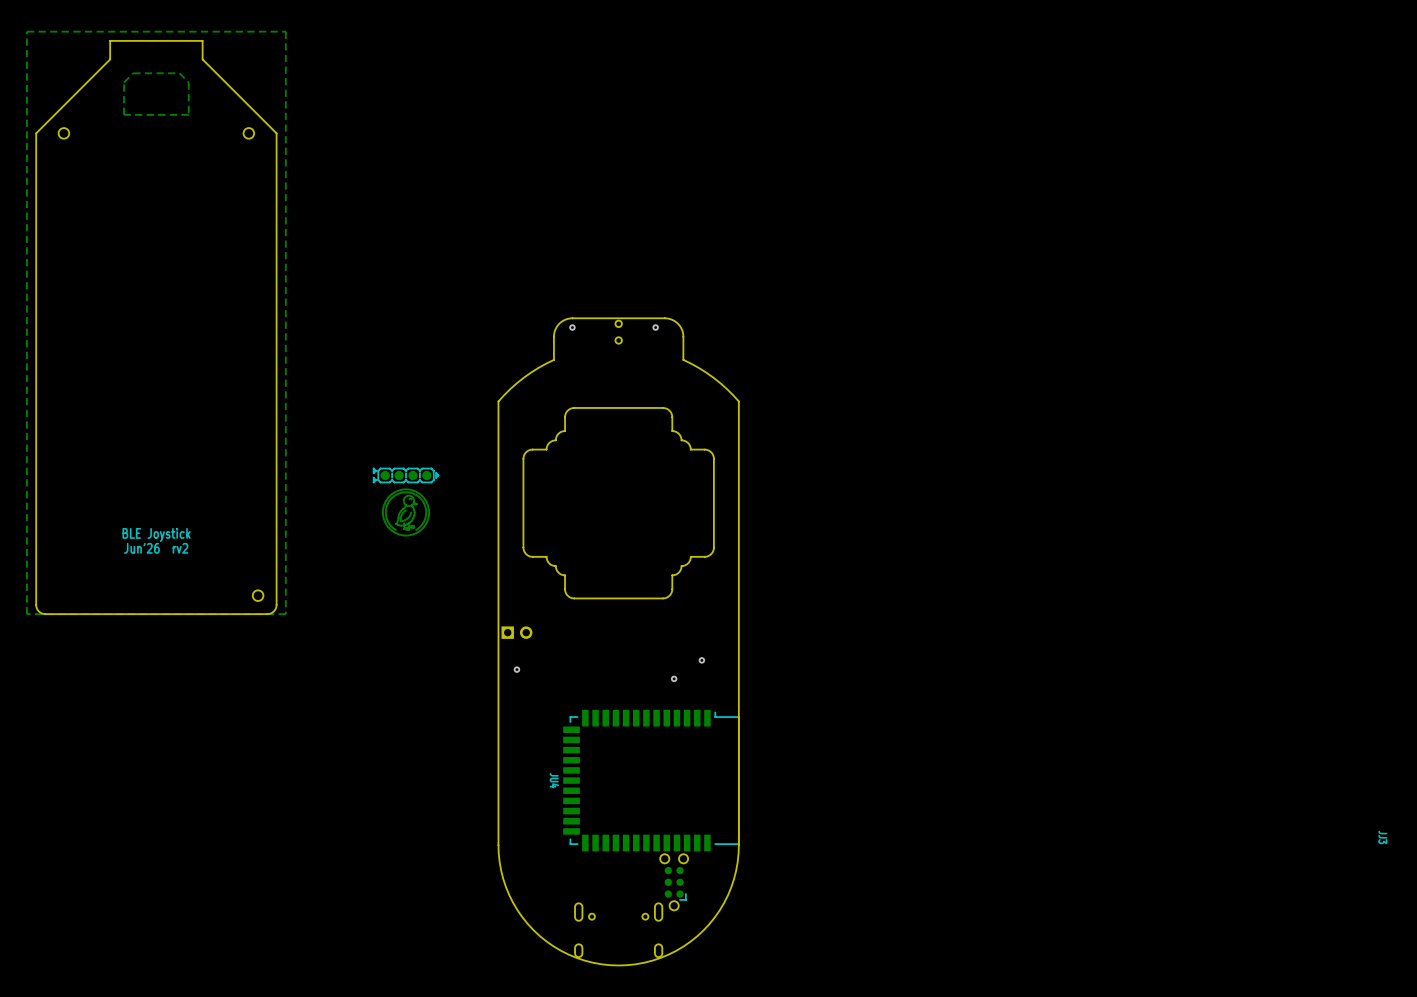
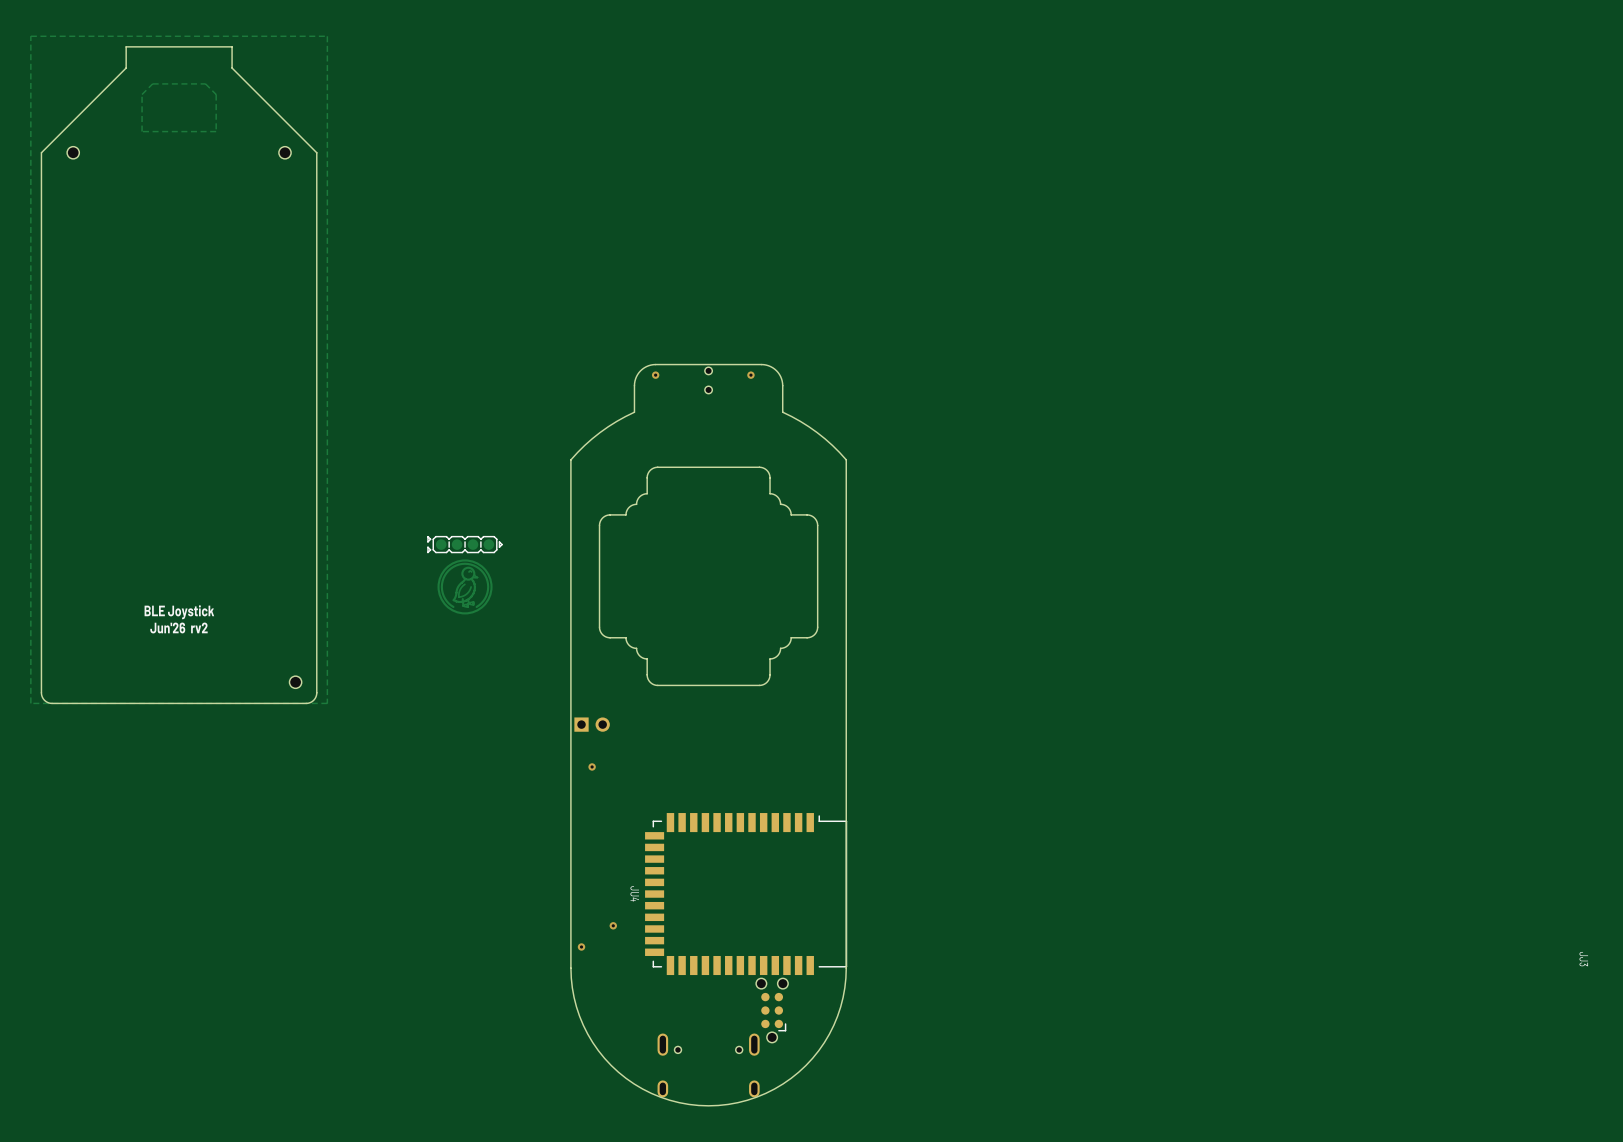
via: (701, 660) -> none
via: (674, 678) -> none
via: none -> (613, 925)
via: none -> (581, 946)

